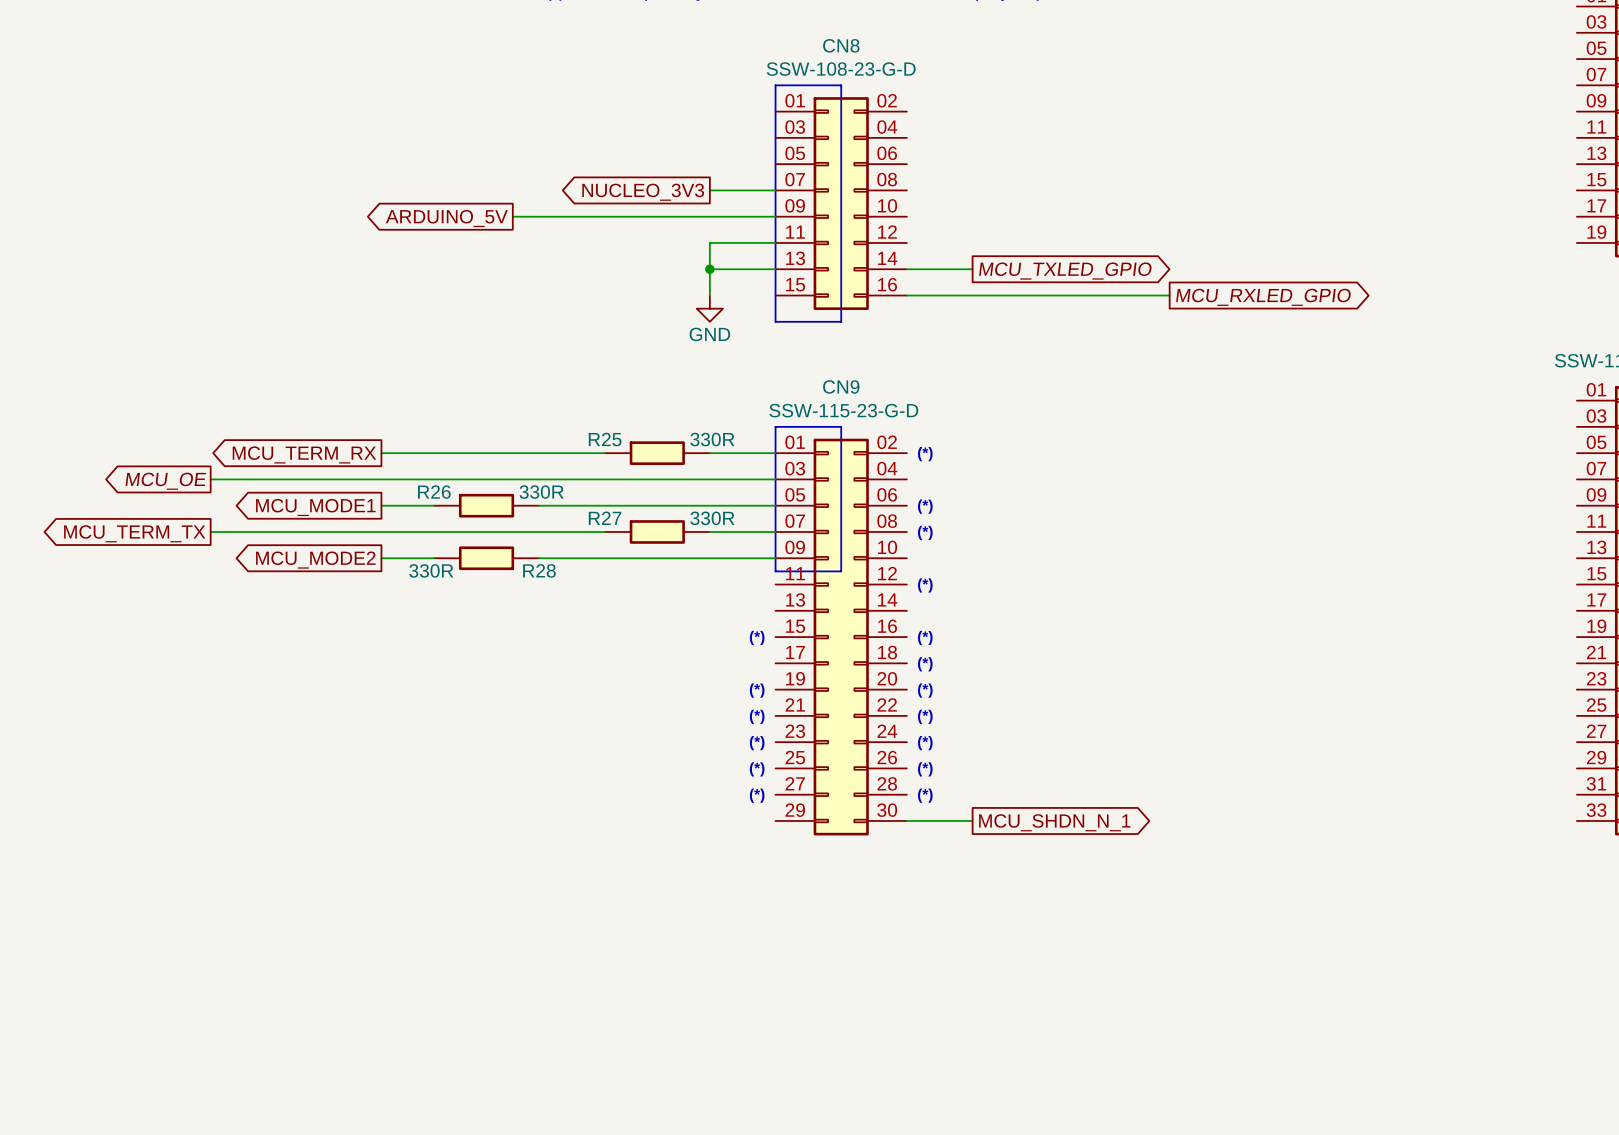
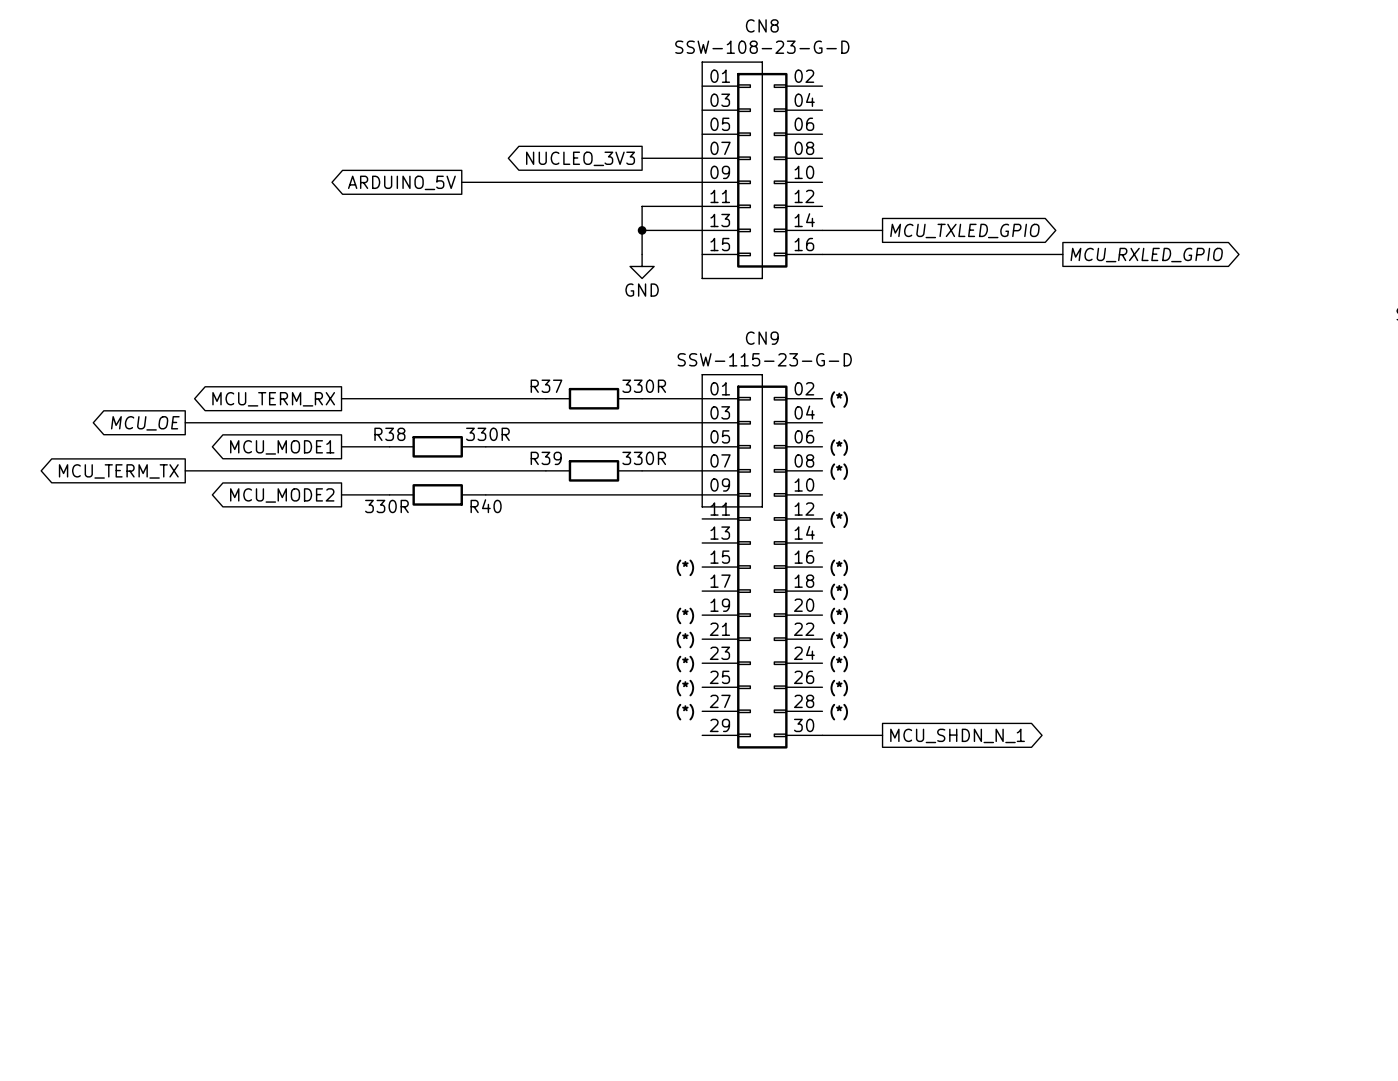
R25 name: R25 (605, 439) -> R37 (546, 386)
R26 name: R26 (434, 492) -> R38 (389, 434)
R27 name: R27 (605, 518) -> R39 (546, 458)
R28 name: R28 (539, 570) -> R40 (486, 506)

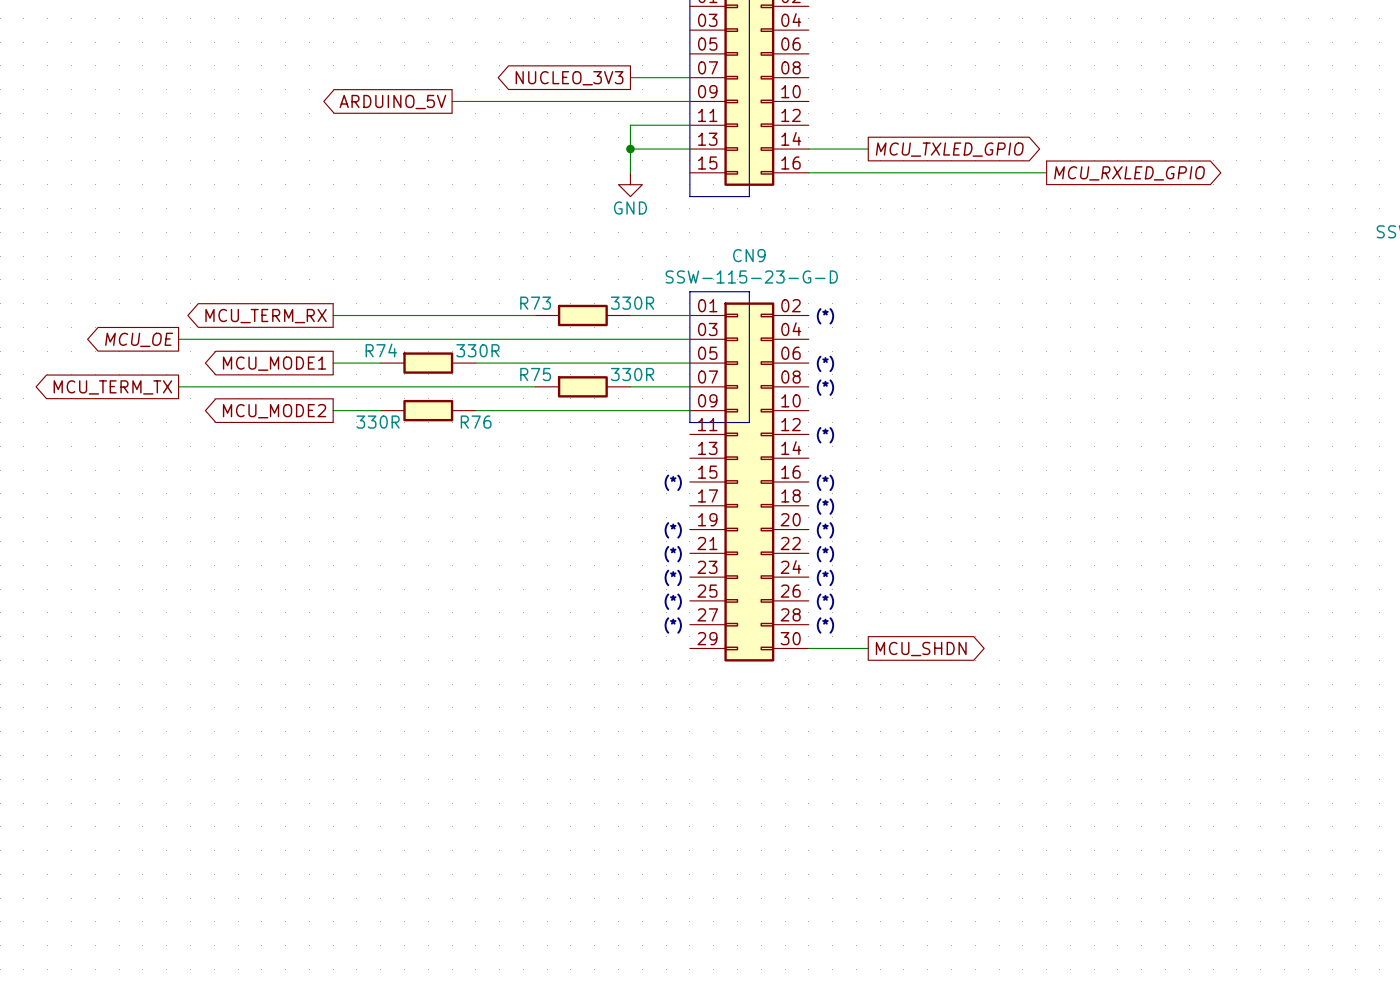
R37 name: R37 (546, 386) -> R73 (535, 303)
R38 name: R38 (389, 434) -> R74 (381, 350)
R39 name: R39 (546, 458) -> R75 (535, 374)
R40 name: R40 (486, 506) -> R76 (476, 422)
global label: MCU_SHDN_N_1 (957, 735) -> MCU_SHDN (921, 649)

